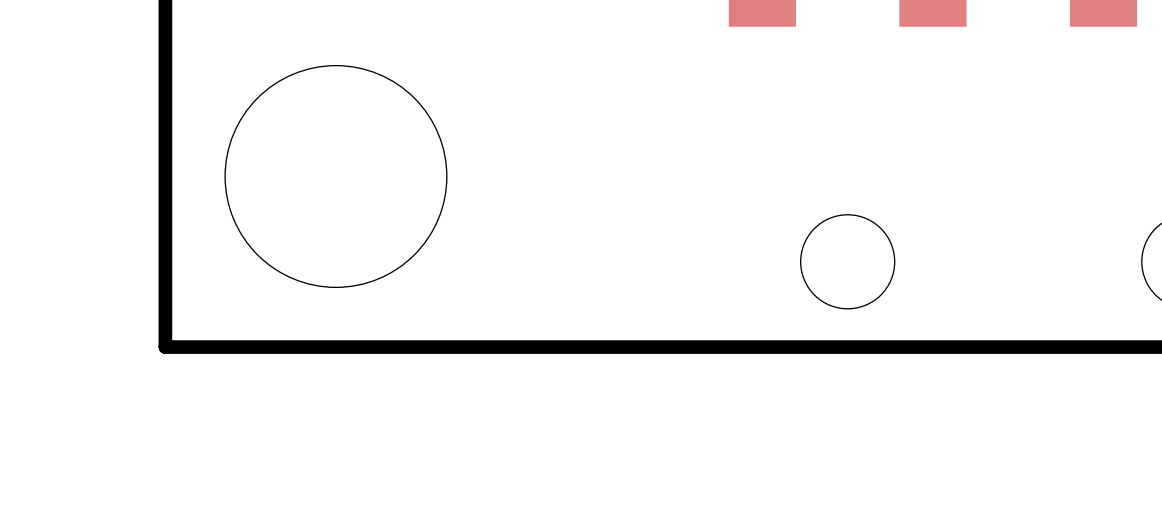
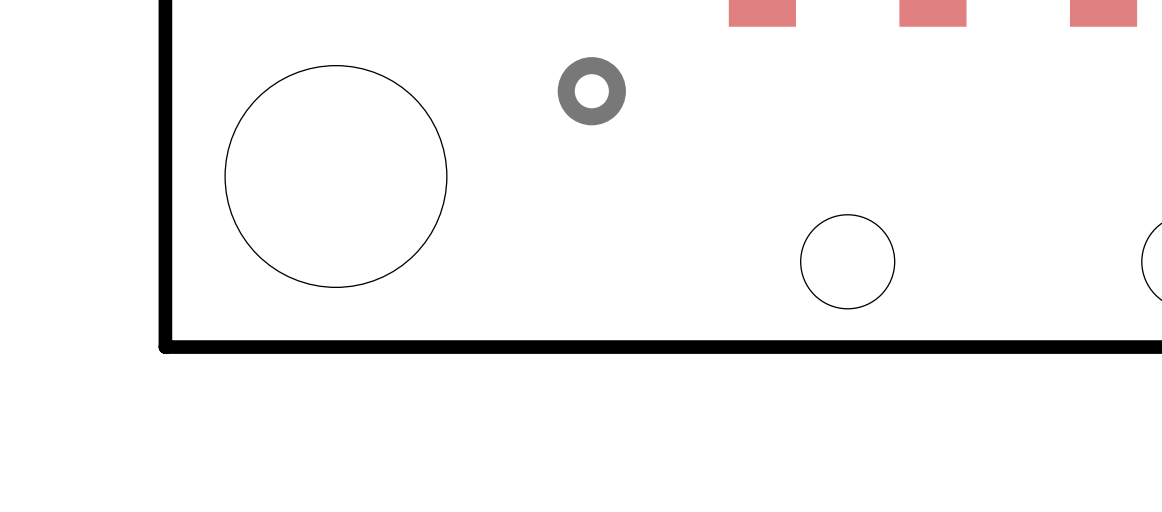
via: none -> (591, 91)

